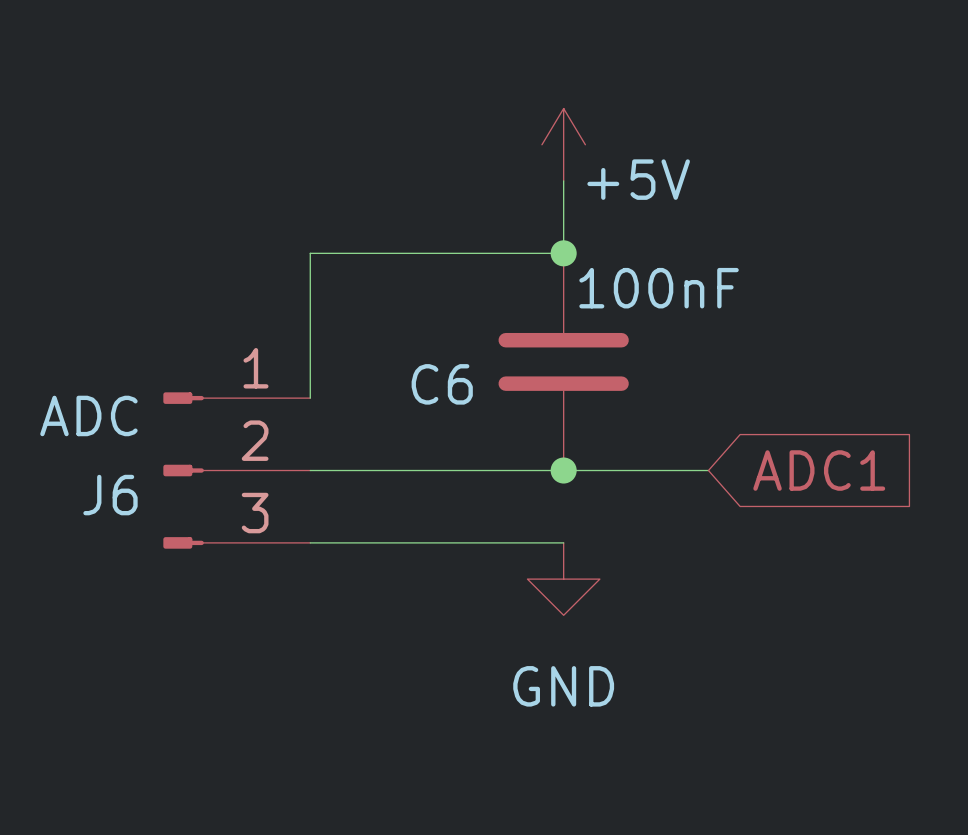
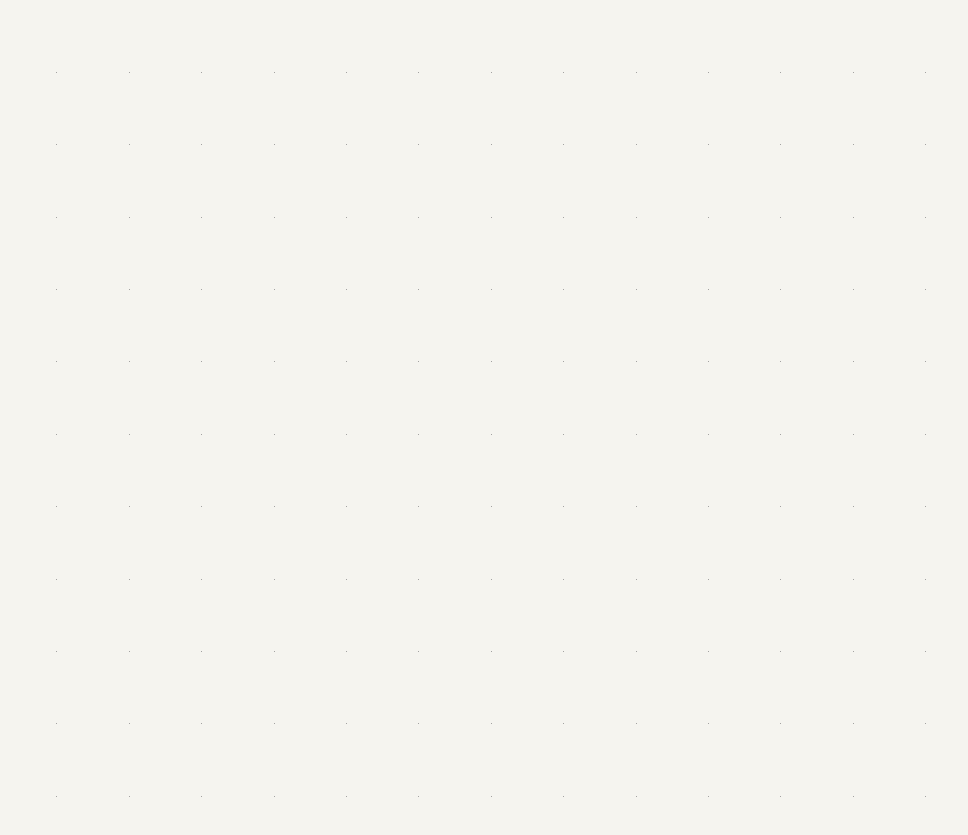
power symbol: +5V (563, 144) -> none
wire: (563, 180) (563, 253) (310, 253) (310, 398) -> none
junction: (563, 253) -> none
C6: 100nF (563, 361) -> none
J6: ADC (236, 470) -> none
wire: (310, 470) (708, 470) -> none
junction: (563, 470) -> none
global label: ADC1 (819, 470) -> none
wire: (310, 542) (563, 542) -> none
power symbol: GND (563, 579) -> none

